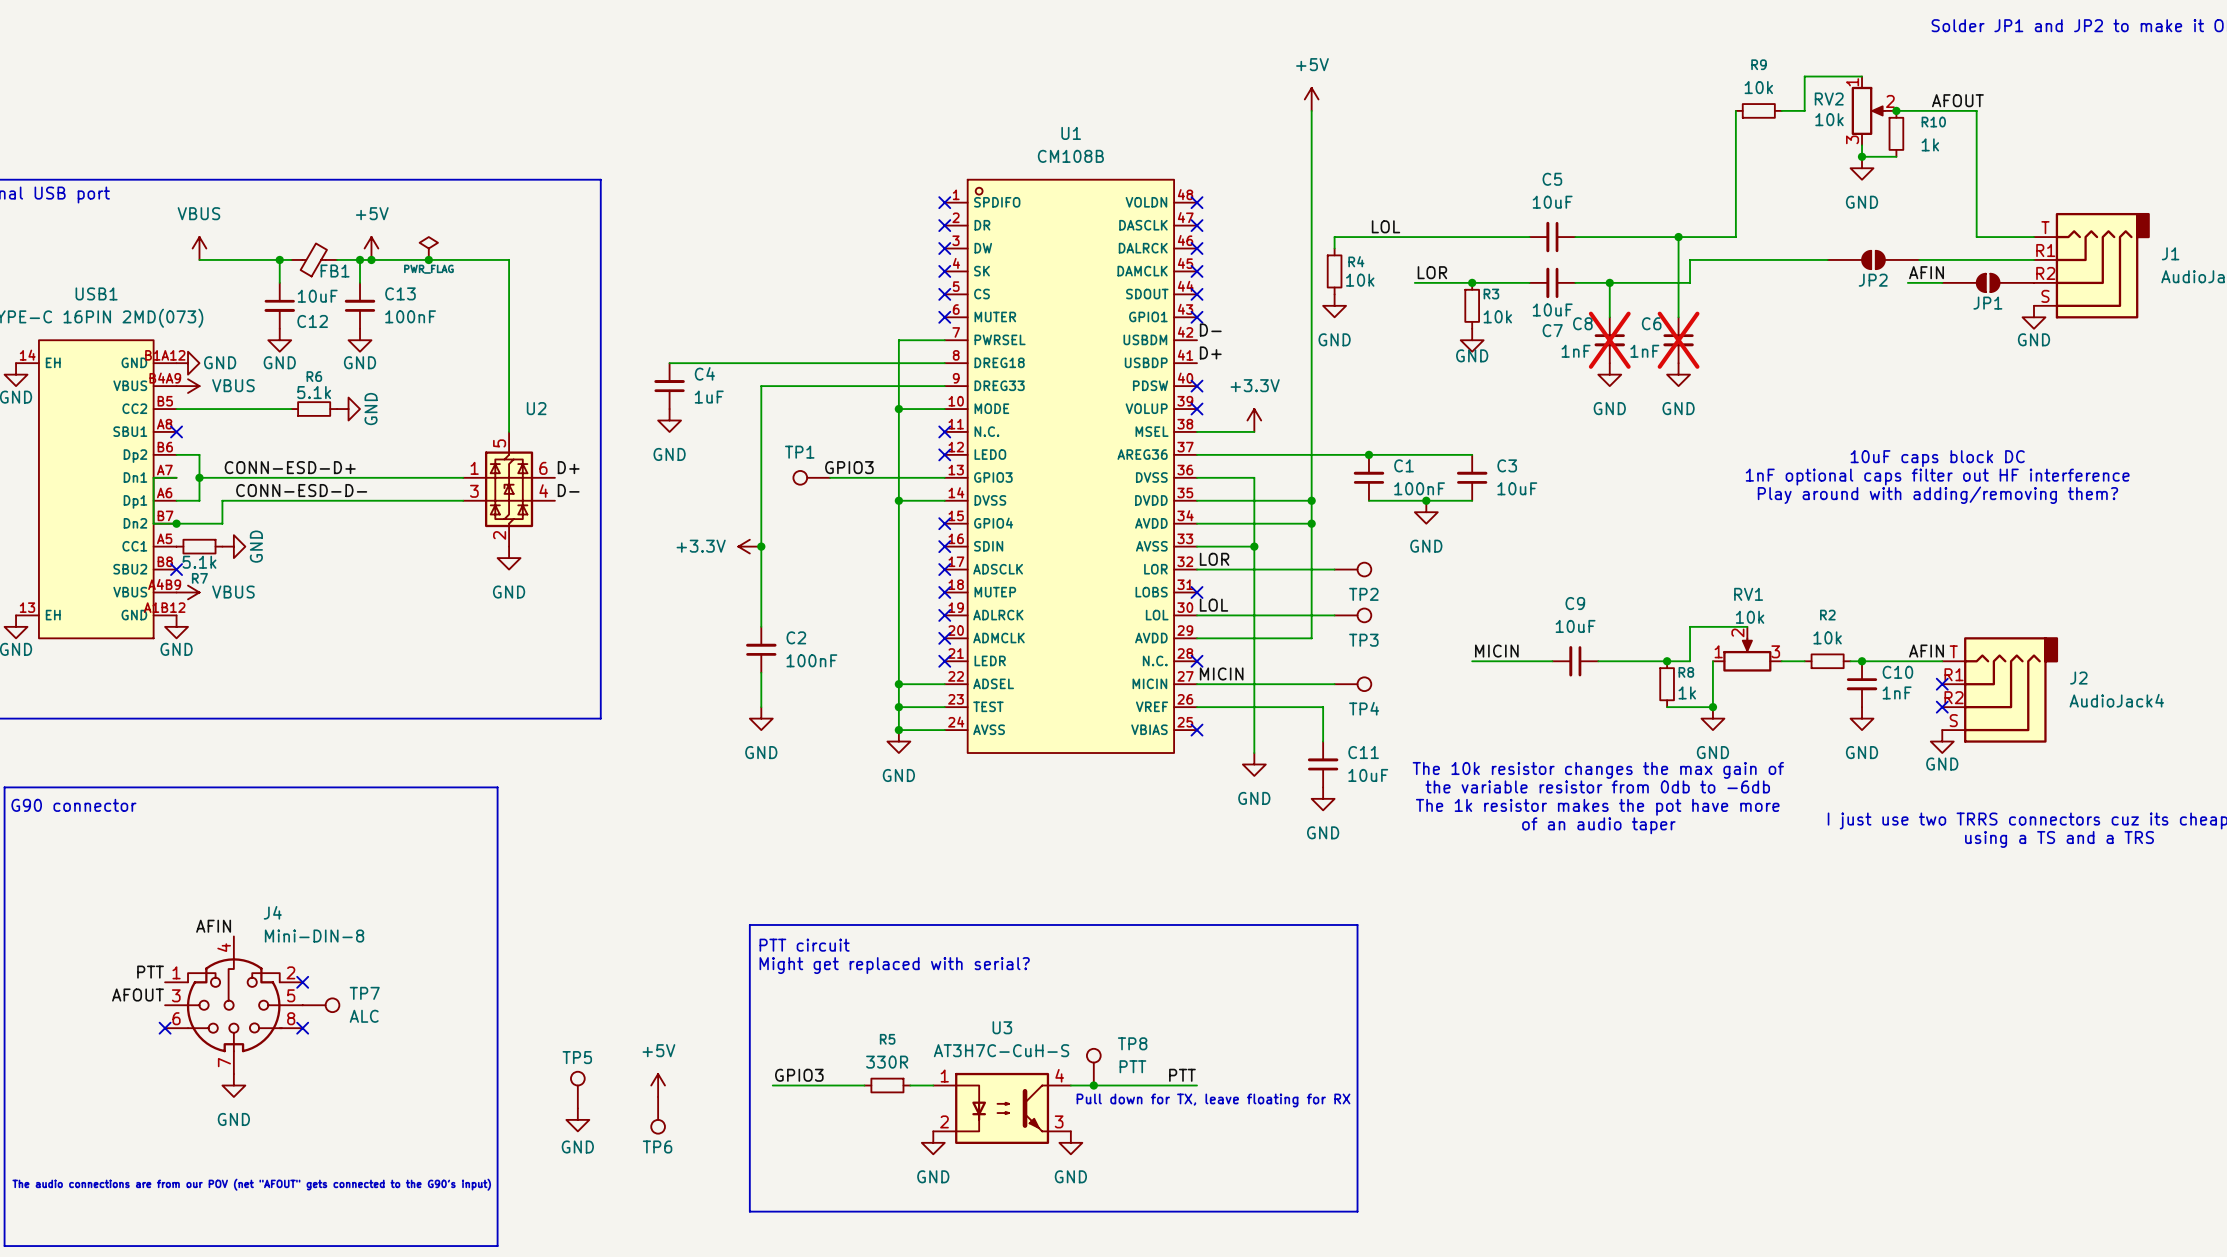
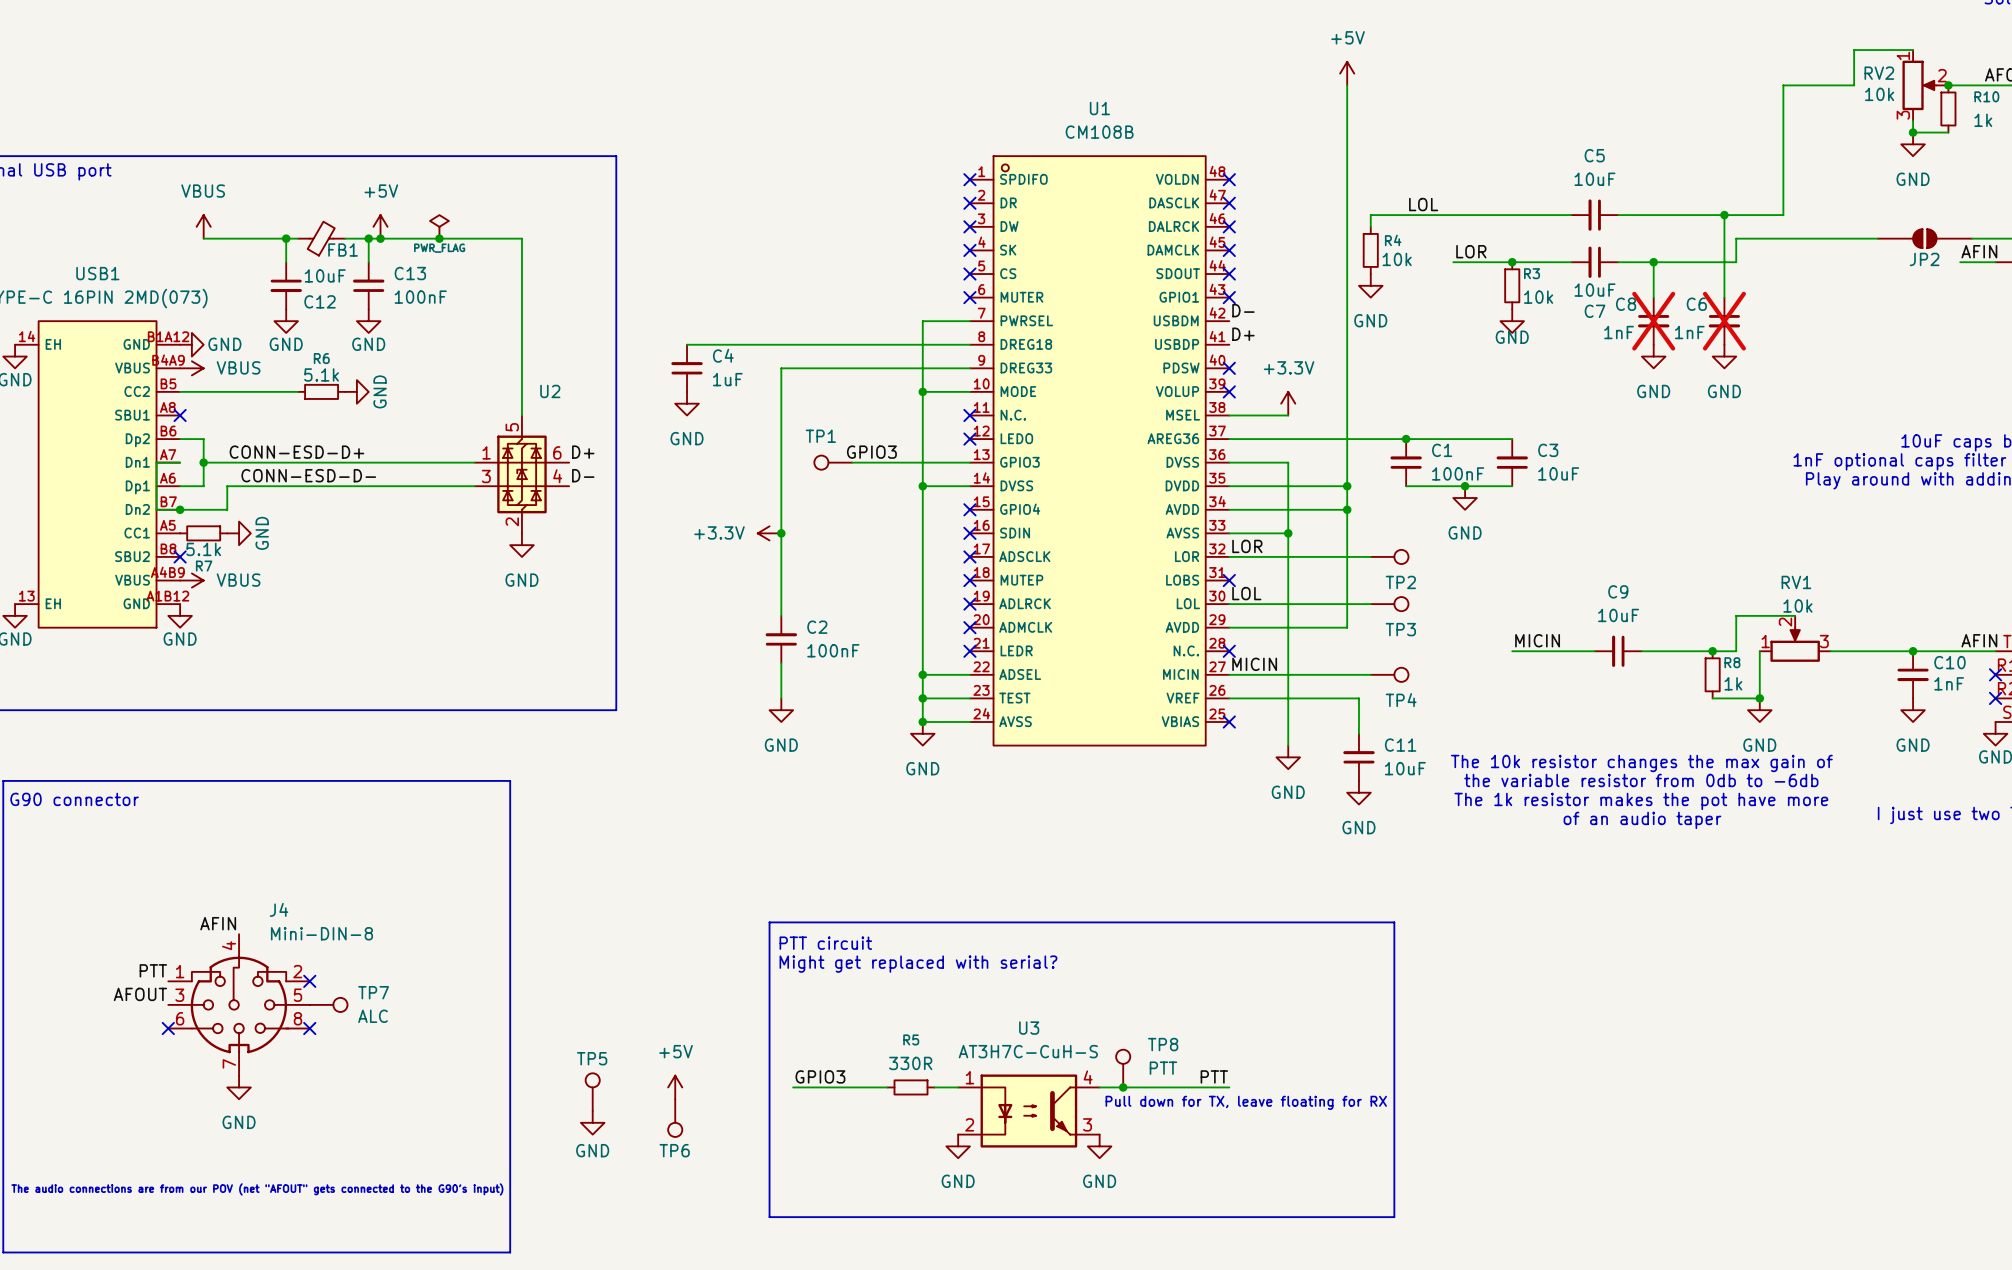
wire: none -> (1783, 85) (1830, 85)
R9: 10k (1758, 110) -> none
wire: none -> (1854, 651) (1901, 651)
R2: 10k (1827, 661) -> none

